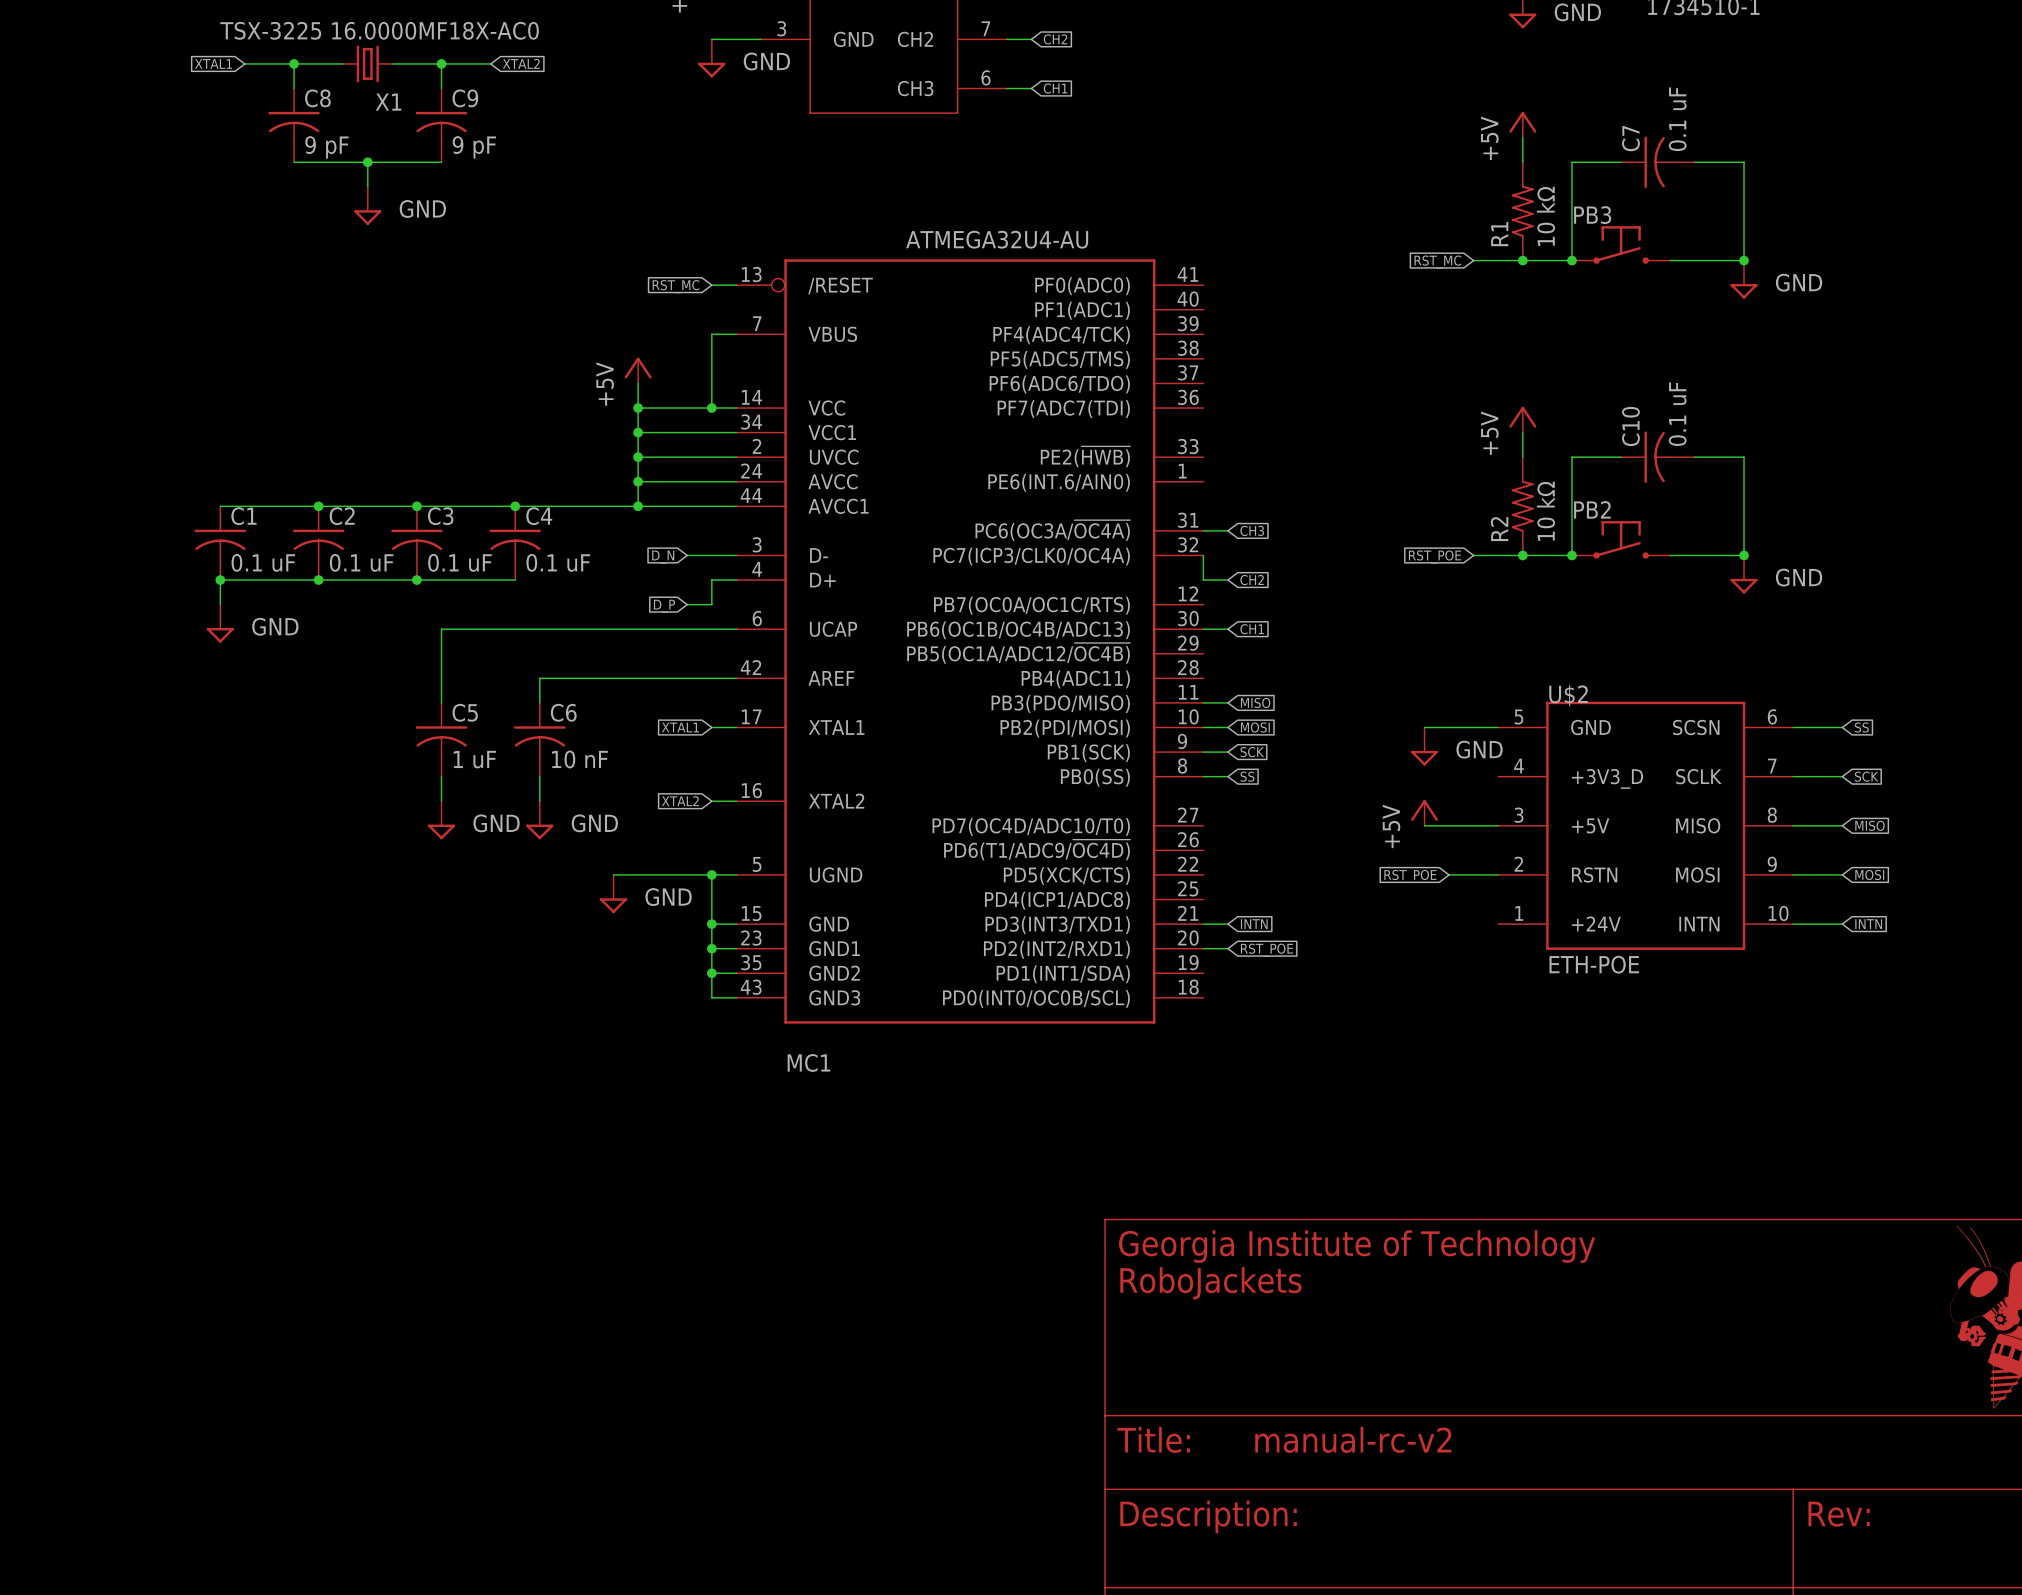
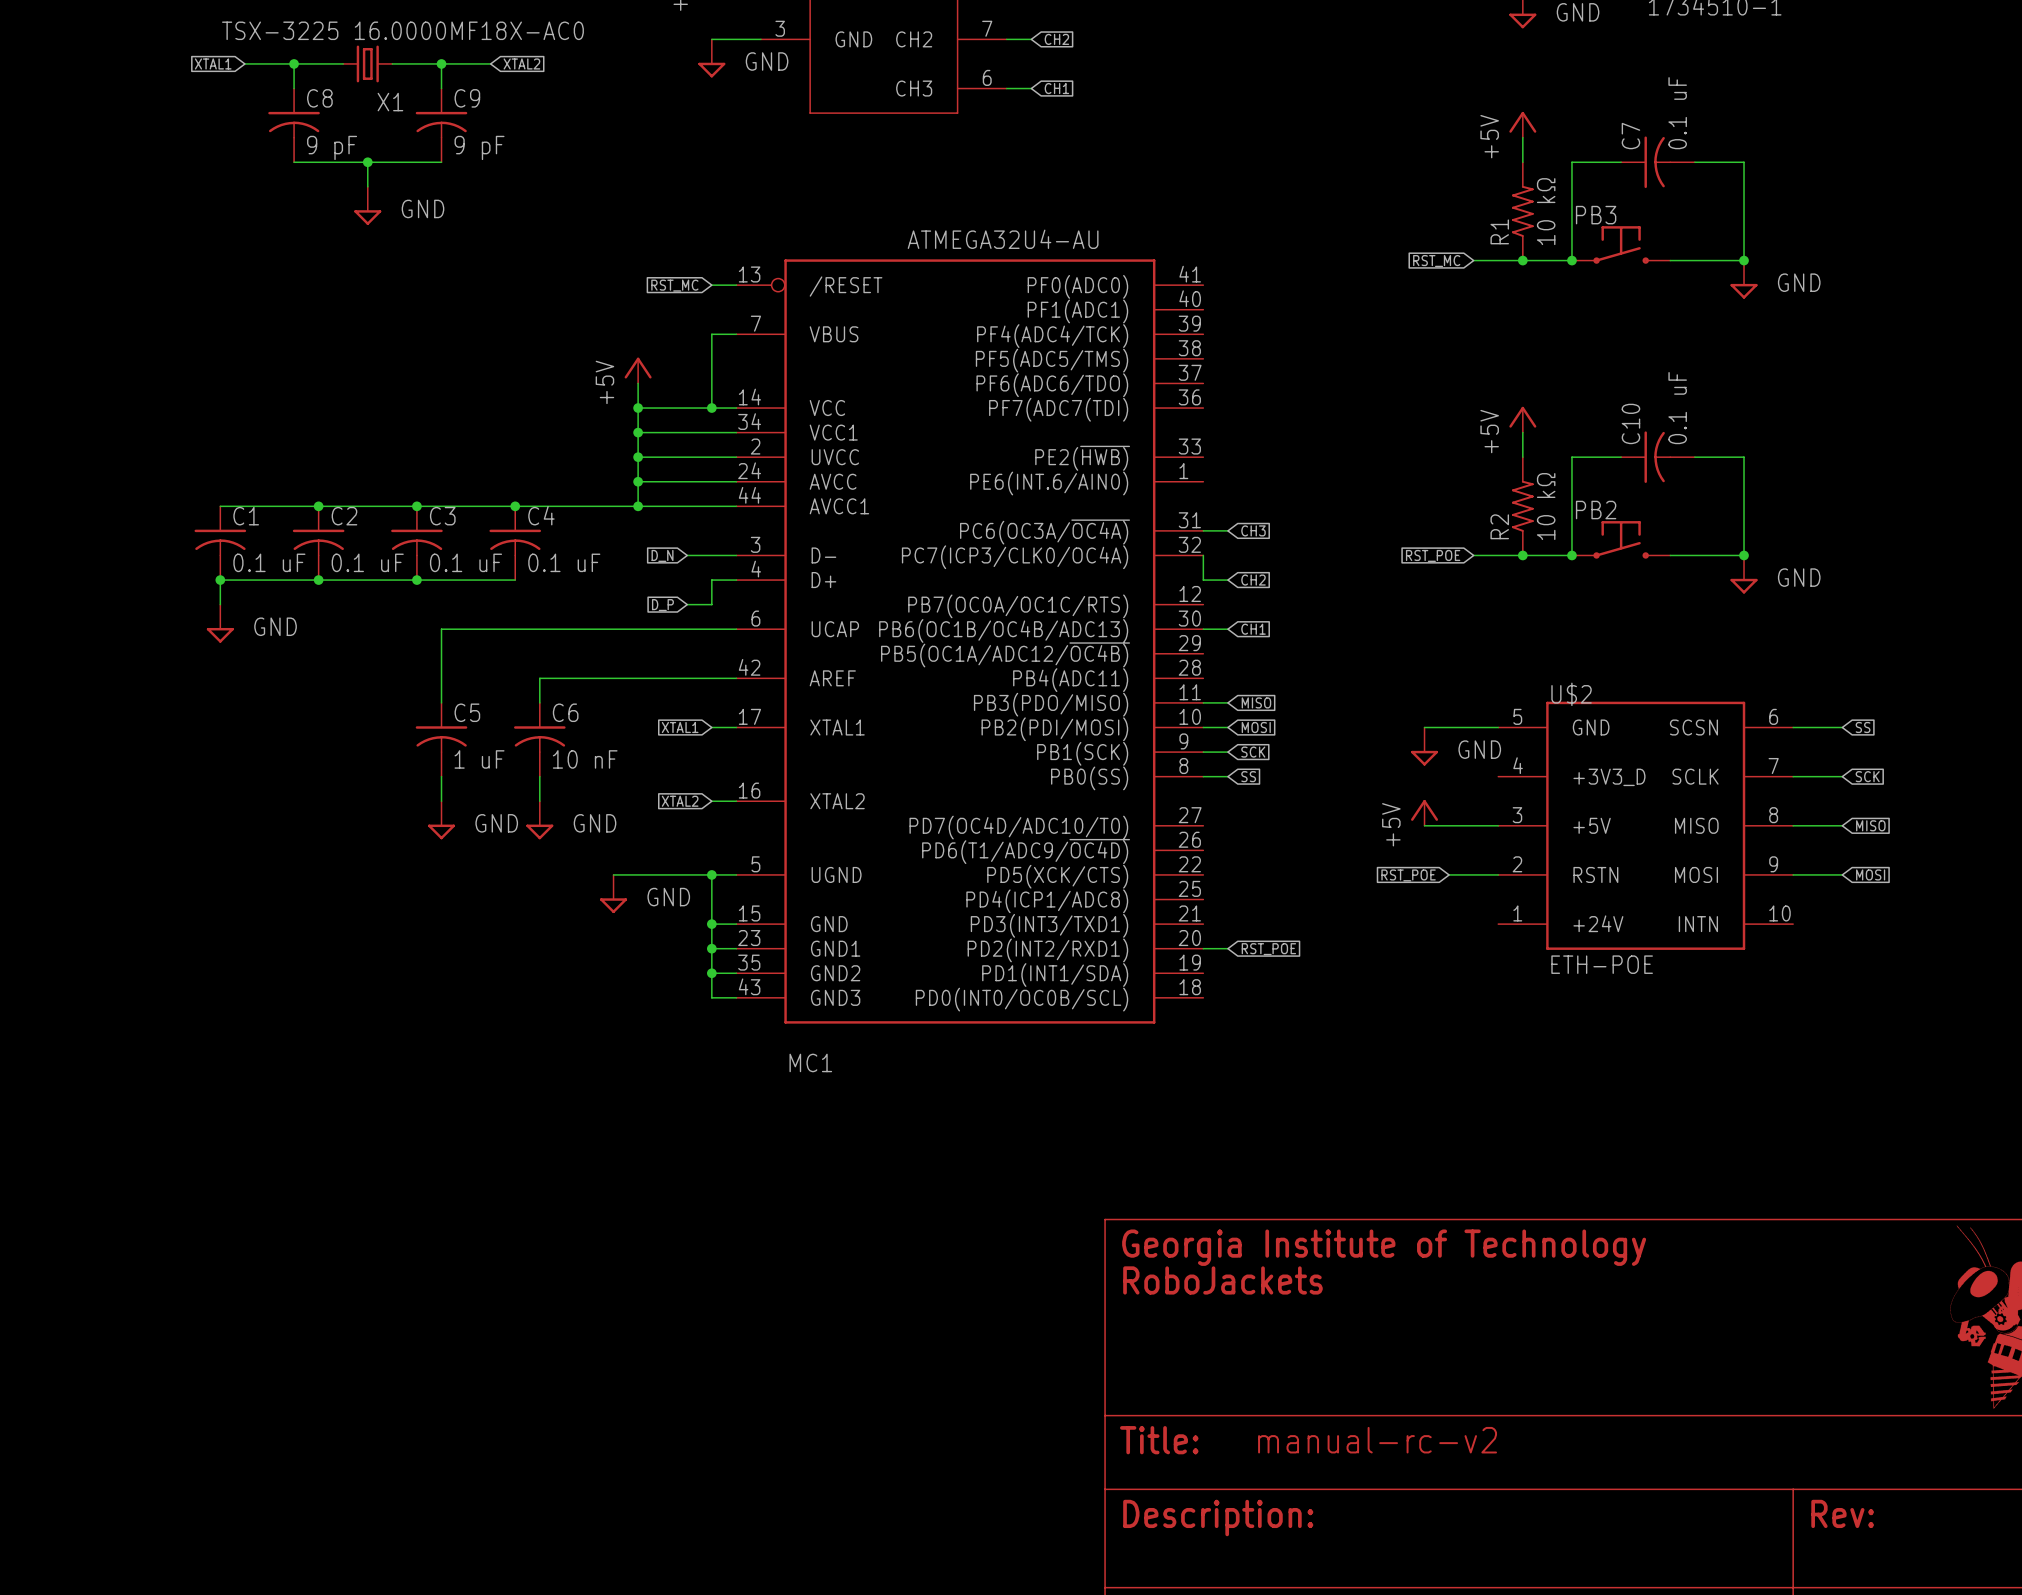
wire: (1203, 924) (1227, 924) -> none
global label: INTN (1254, 924) -> none
wire: (1793, 924) (1842, 924) -> none
global label: INTN (1868, 924) -> none

